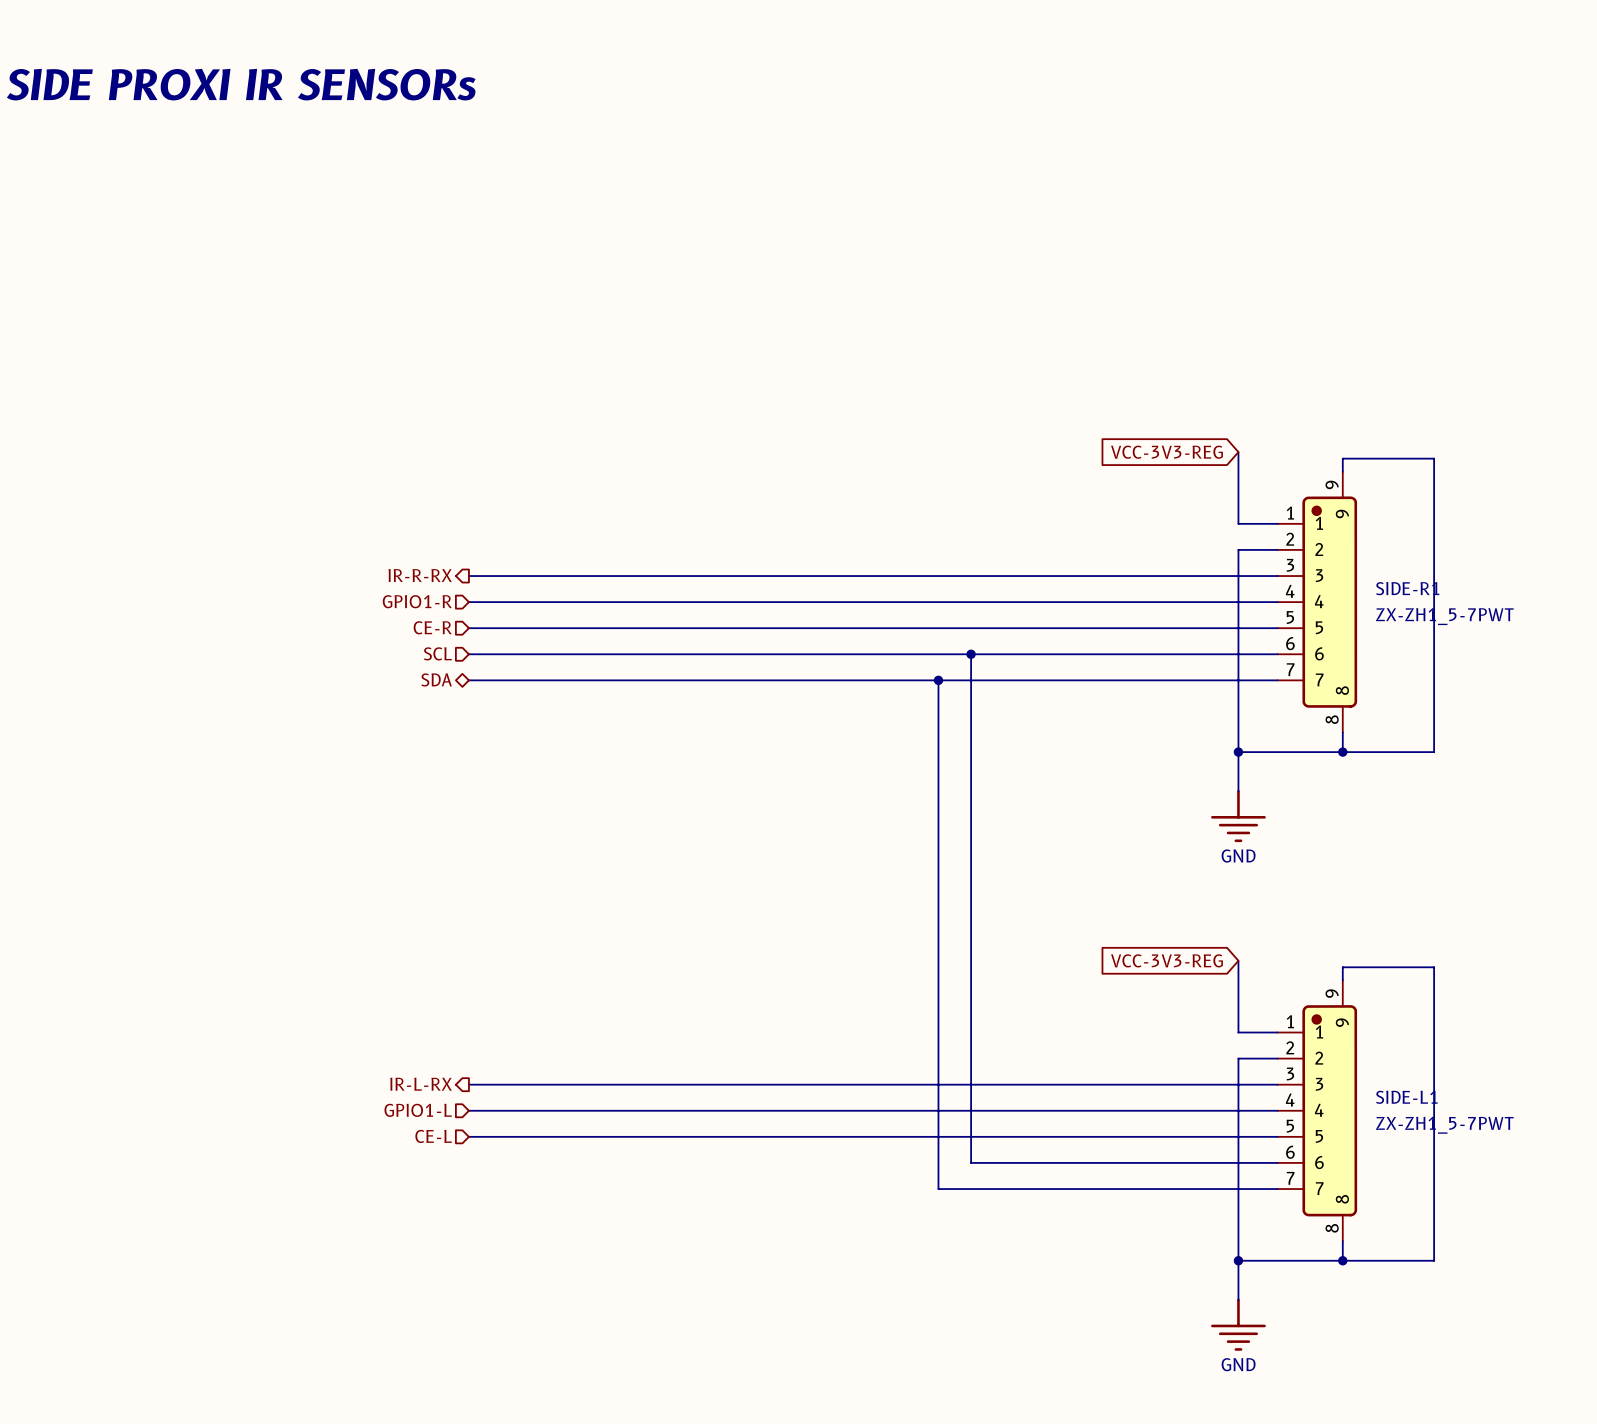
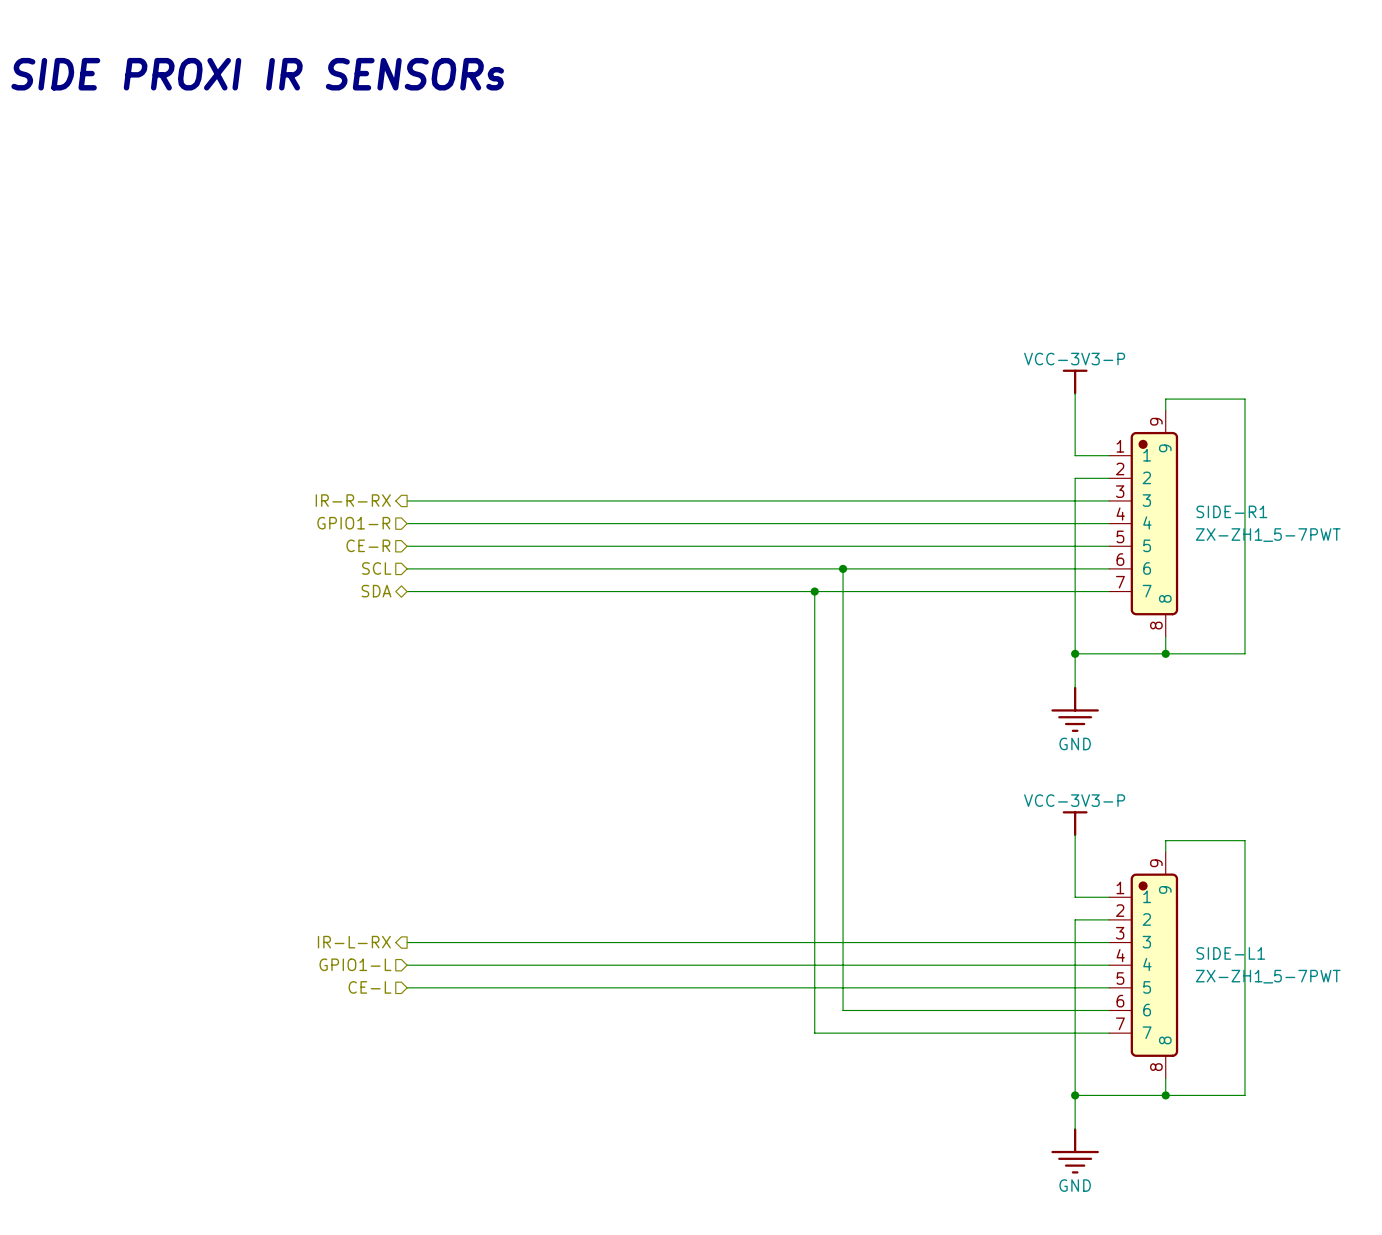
power symbol: none -> VCC-3V3-P (1075, 382)
global label: VCC-3V3-REG (1167, 452) -> none
power symbol: none -> VCC-3V3-P (1075, 823)
global label: VCC-3V3-REG (1167, 960) -> none

